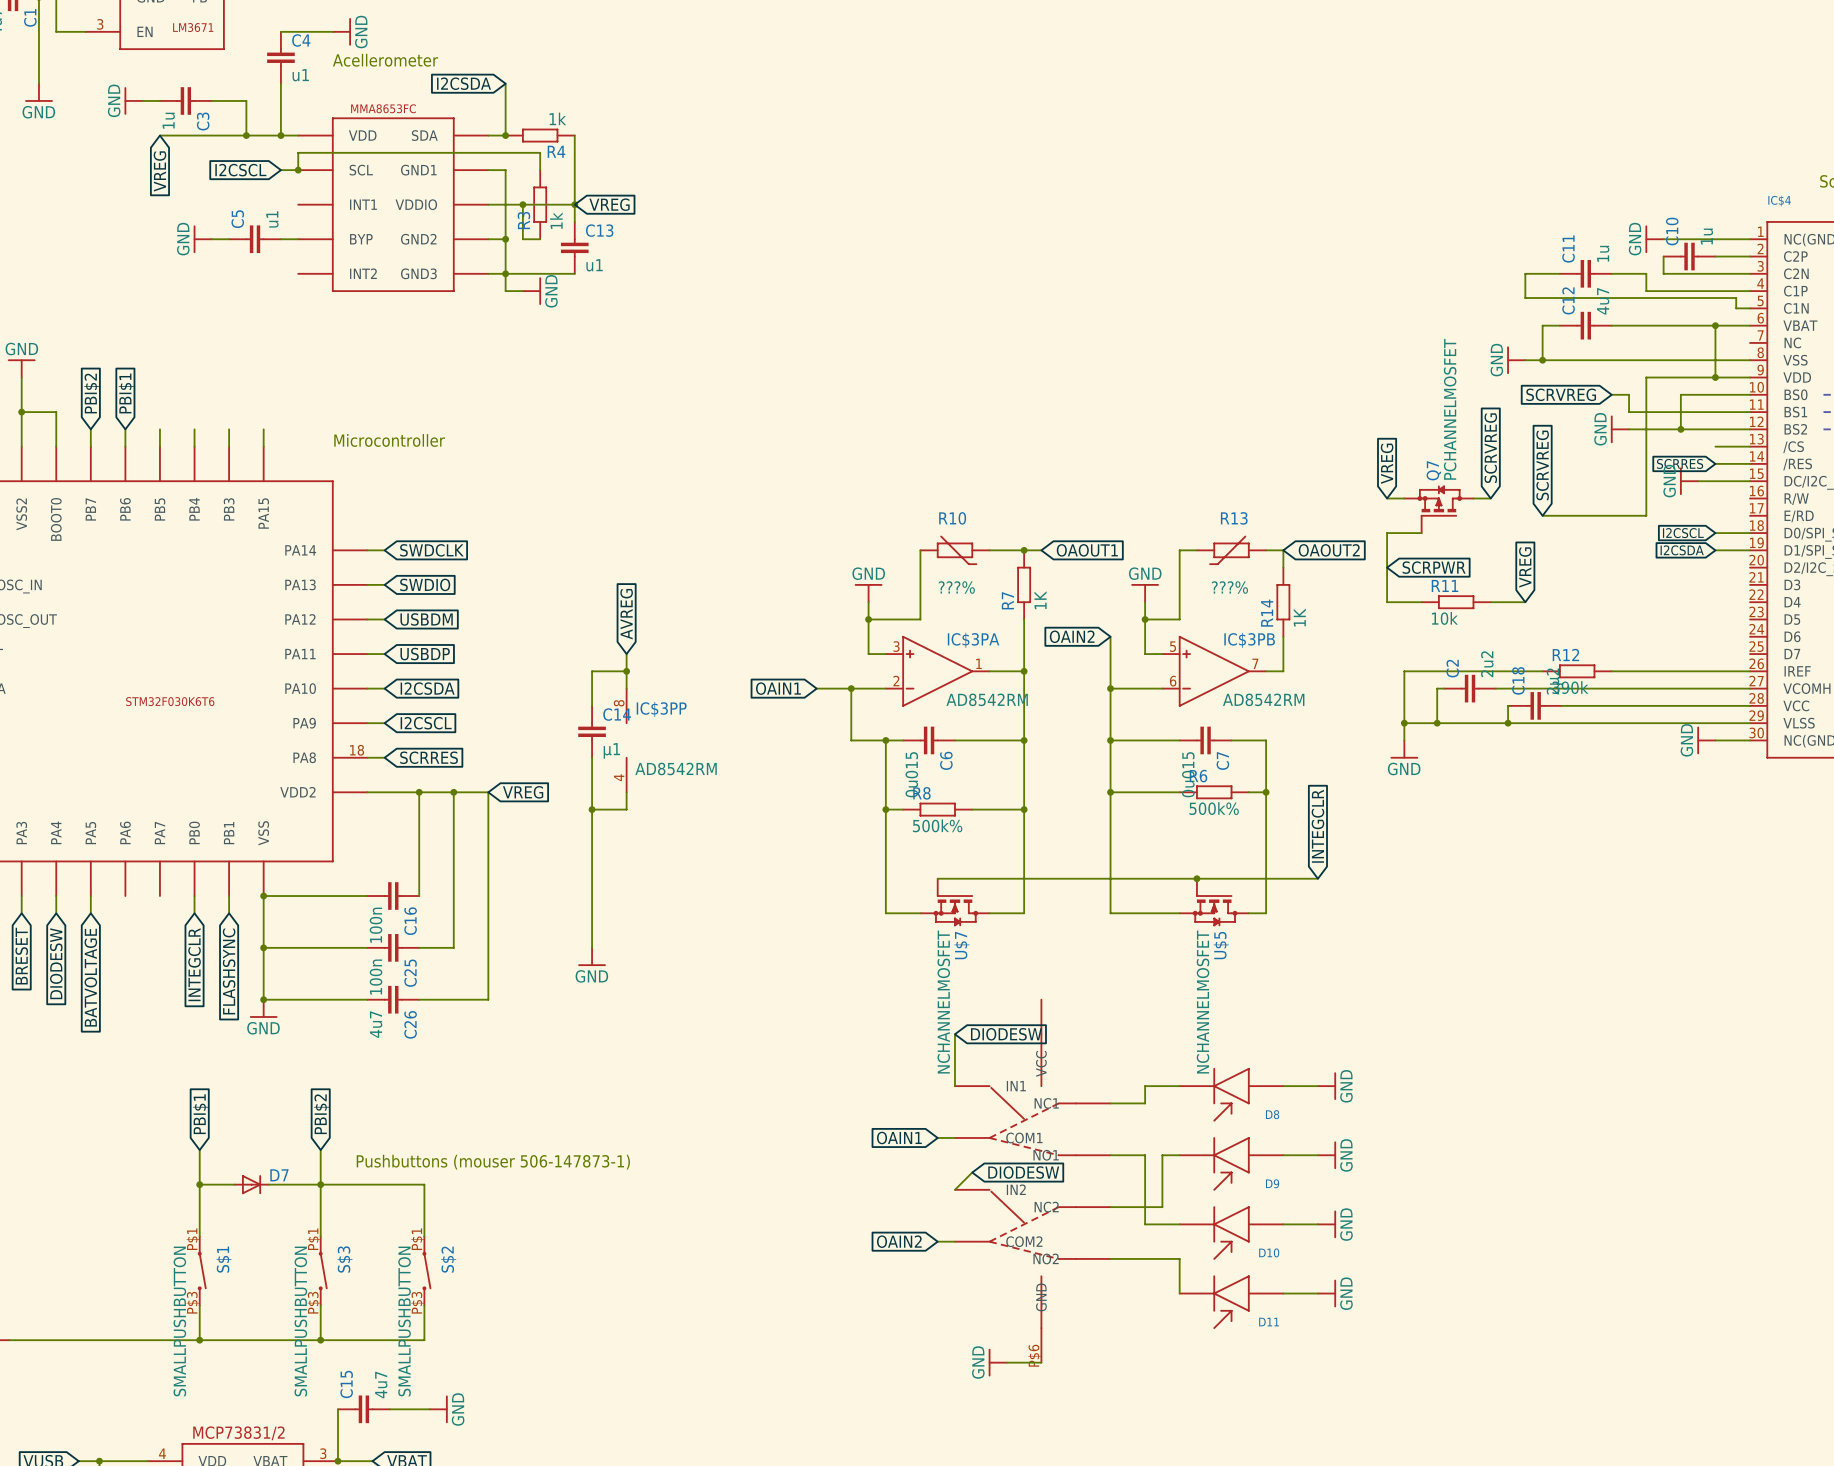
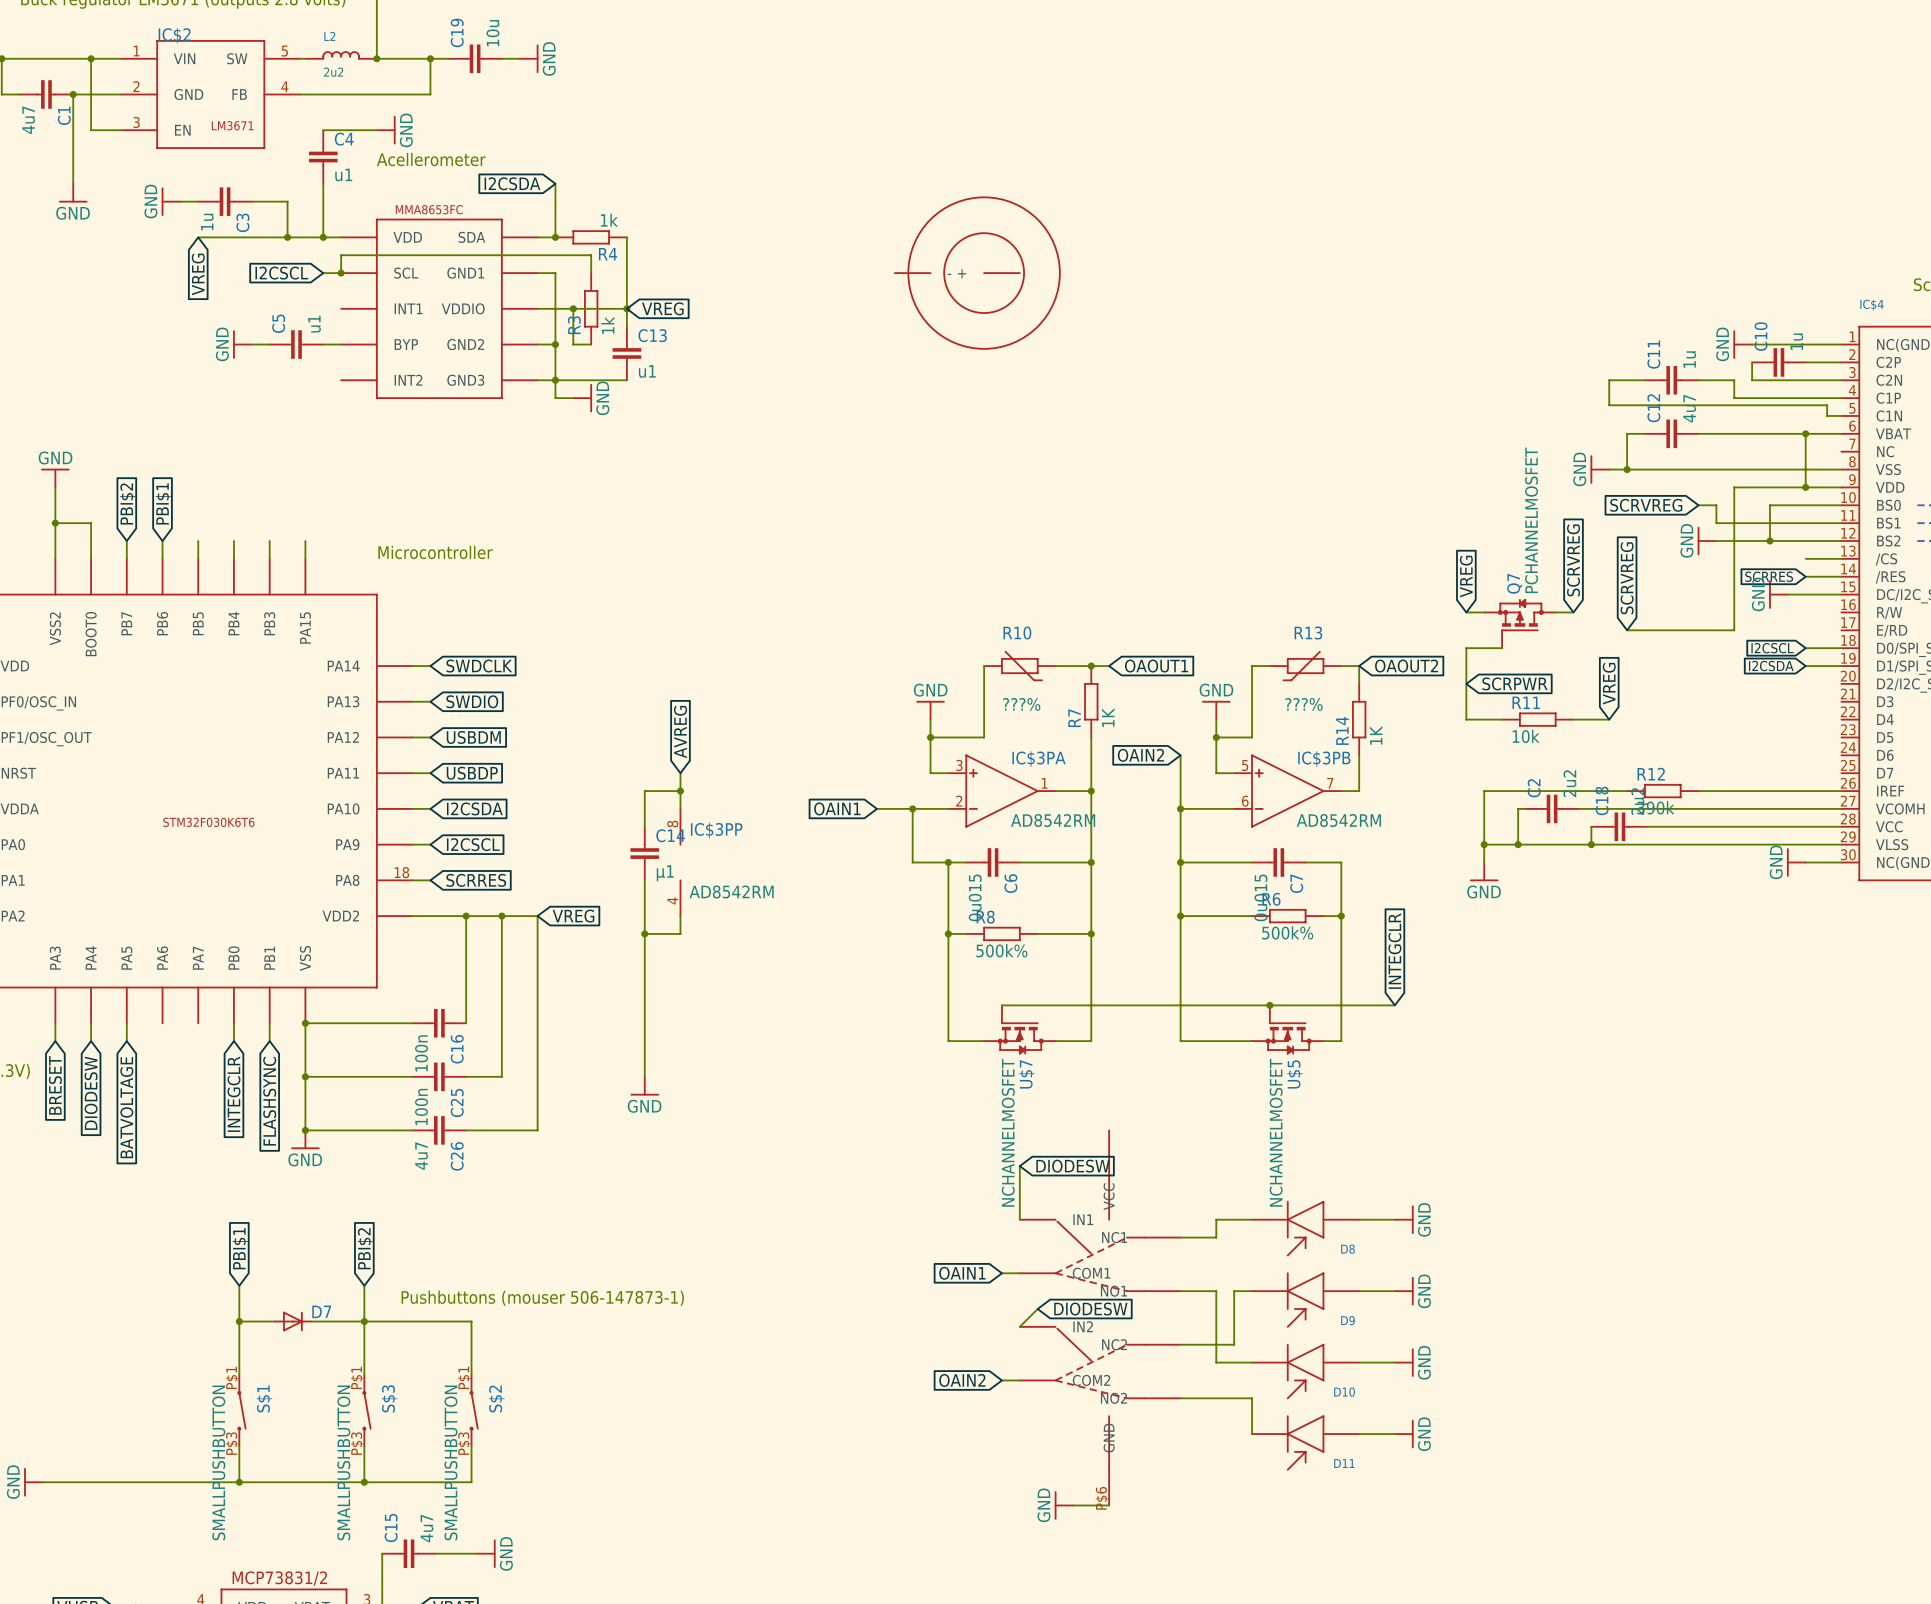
part: none -> (977, 273)

